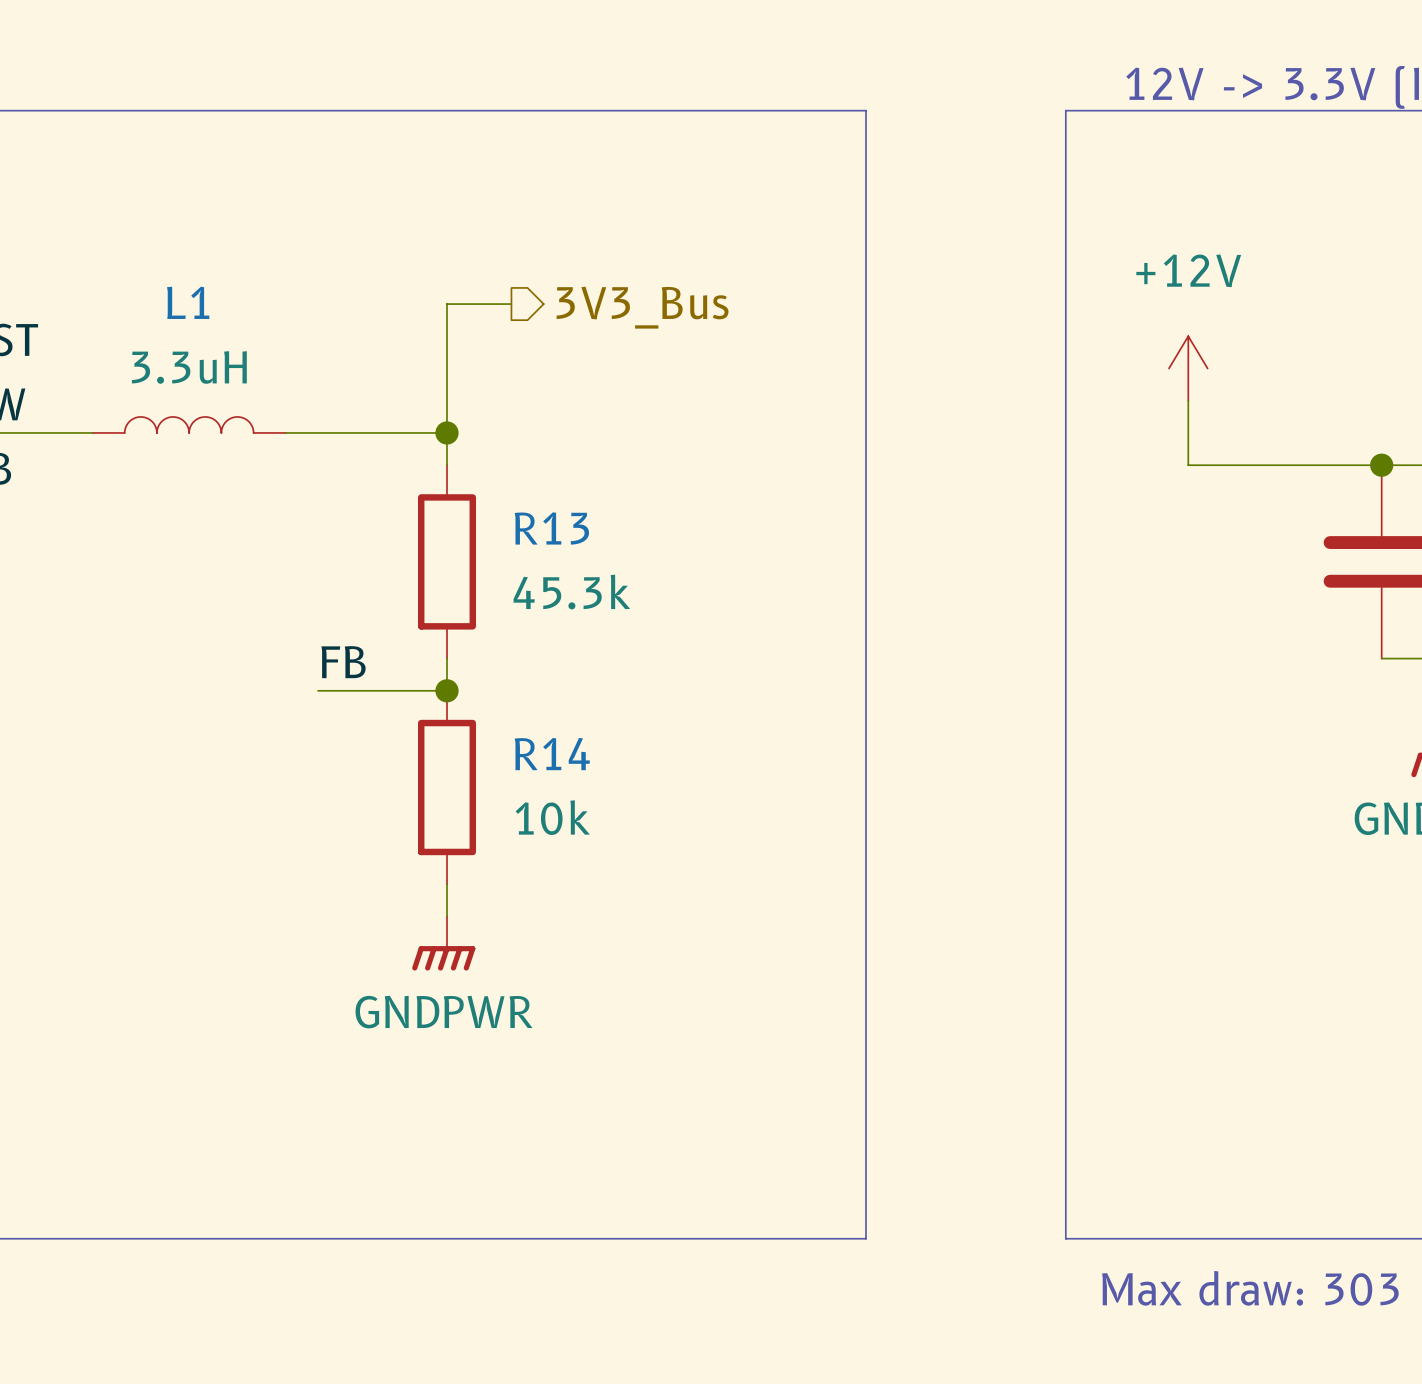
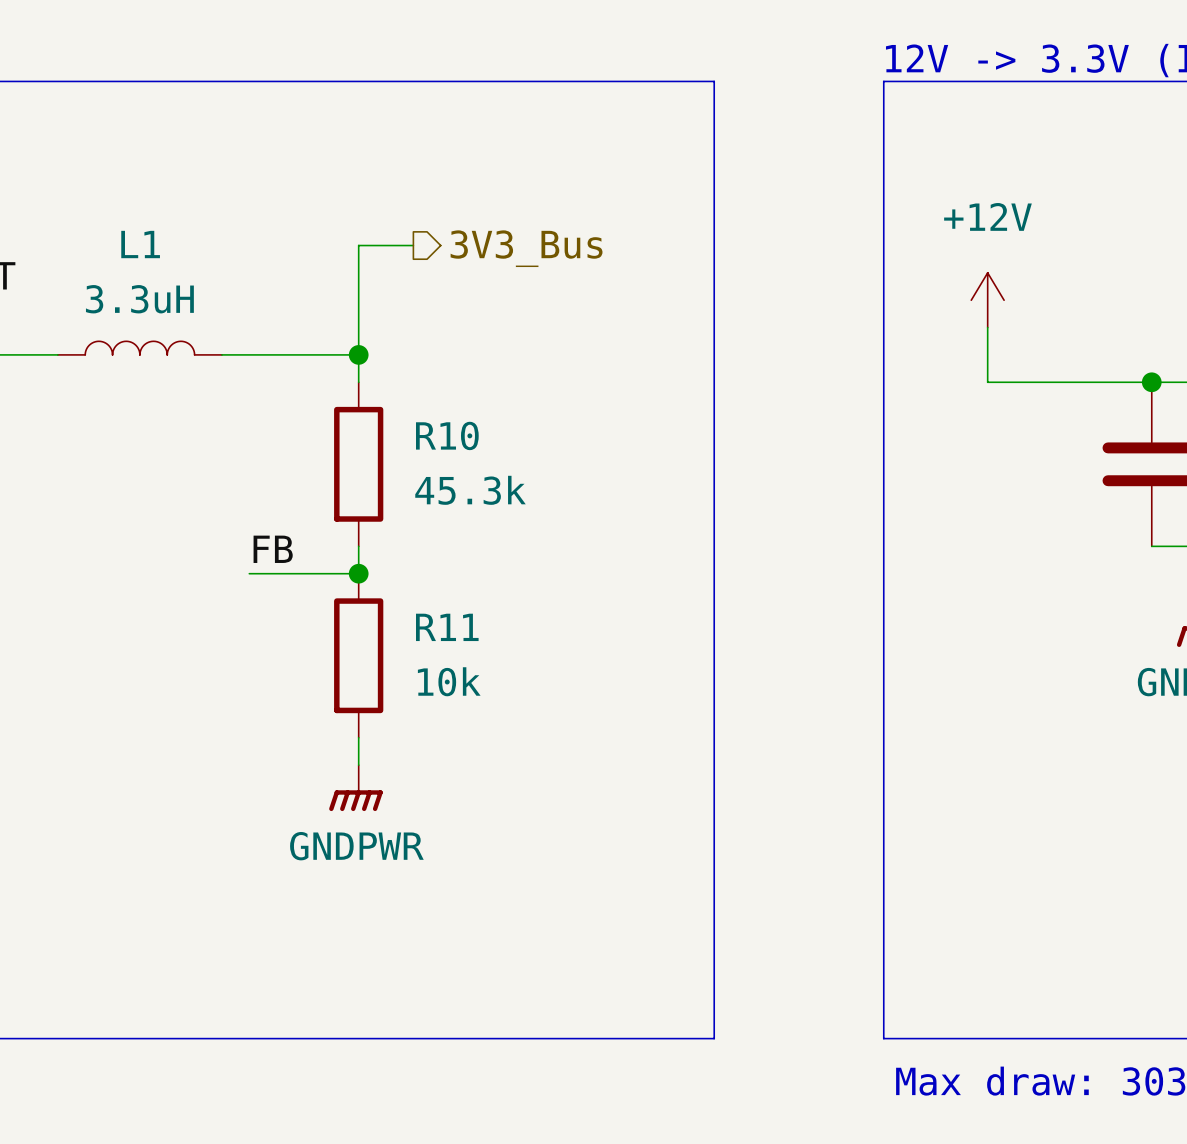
R13 name: R13 (551, 528) -> R10 (447, 435)
R14 name: R14 (552, 754) -> R11 (447, 627)

